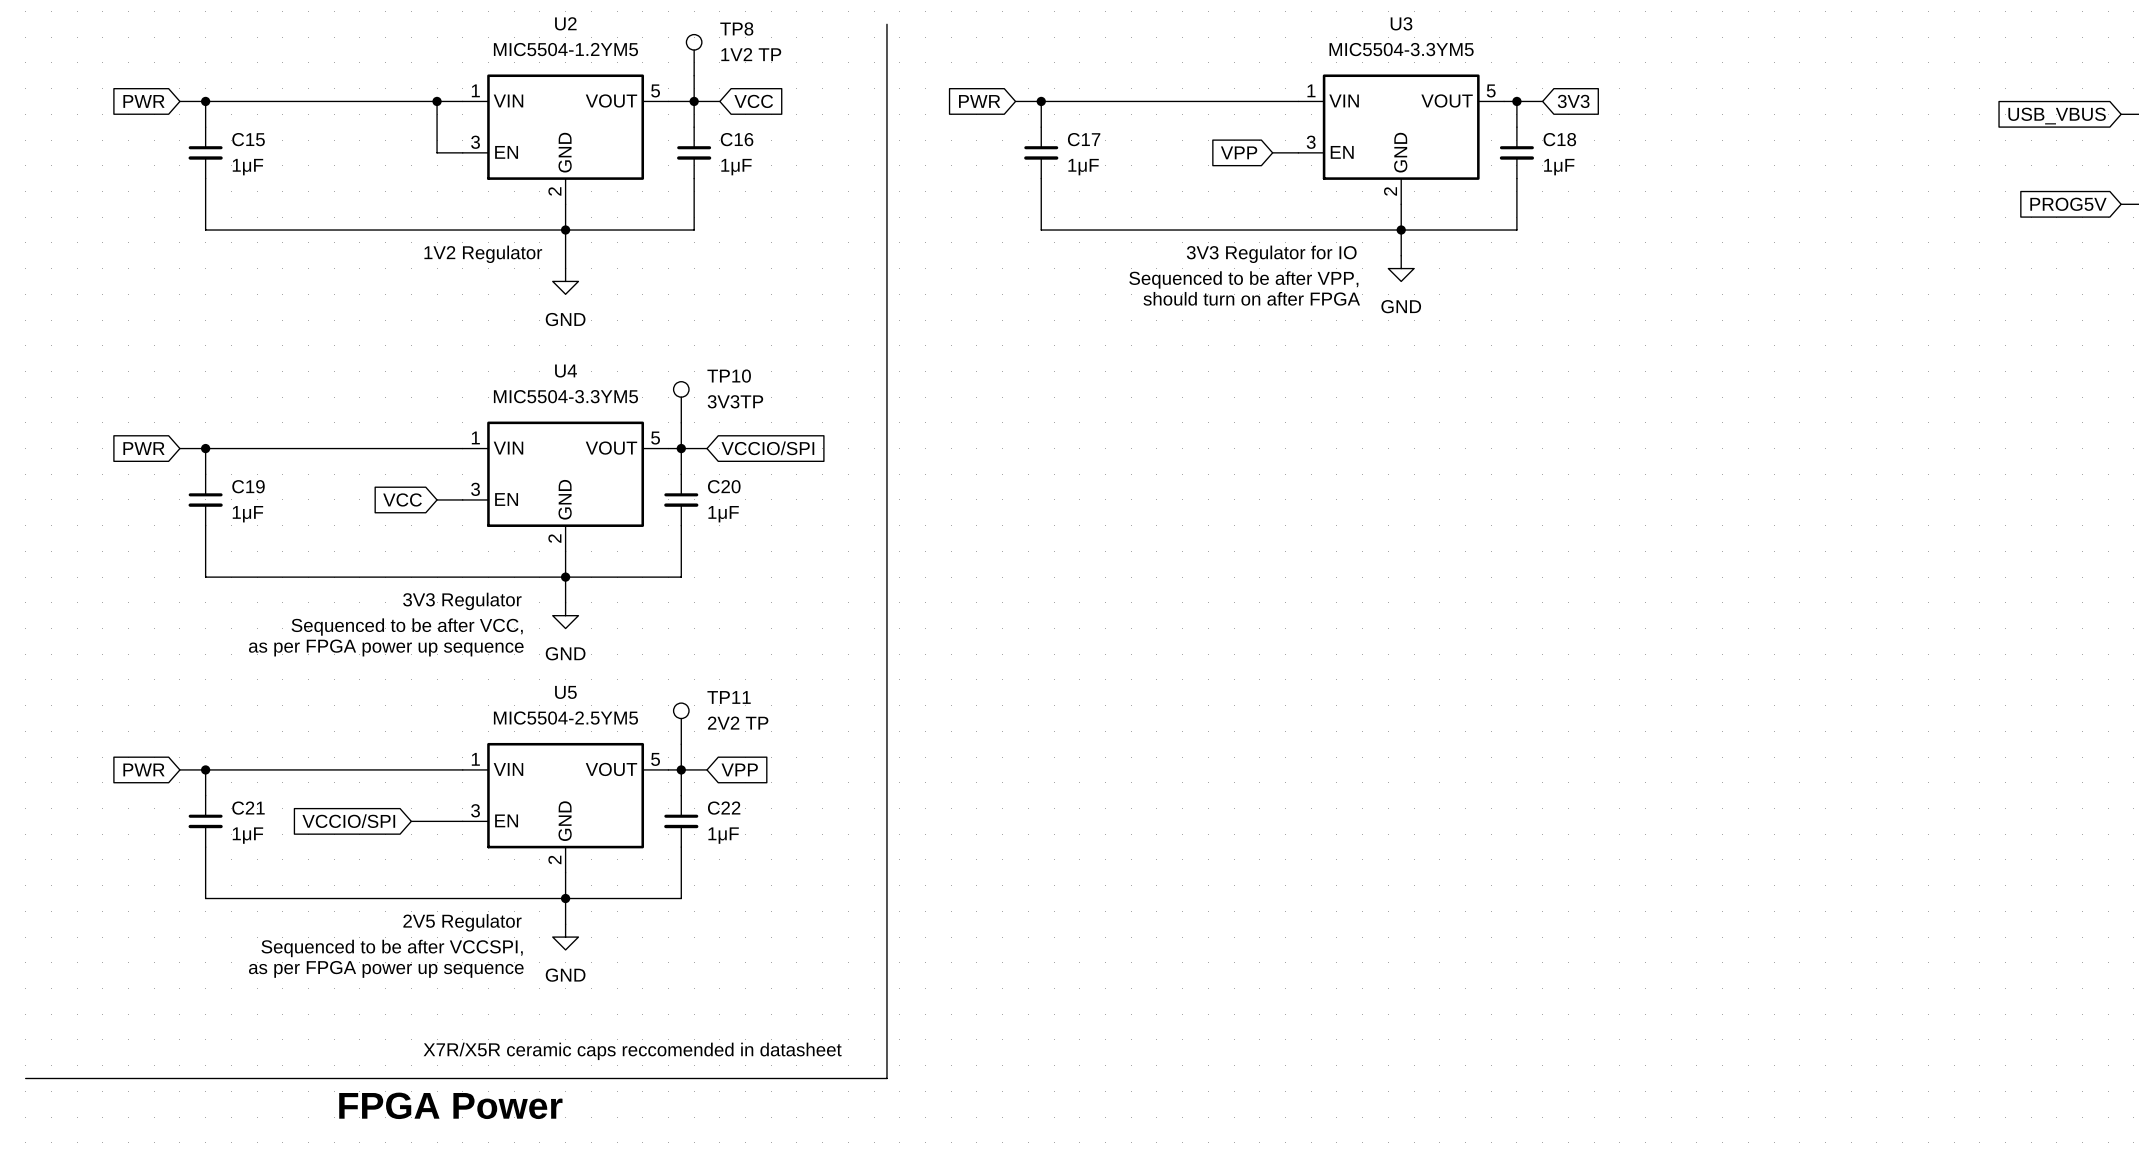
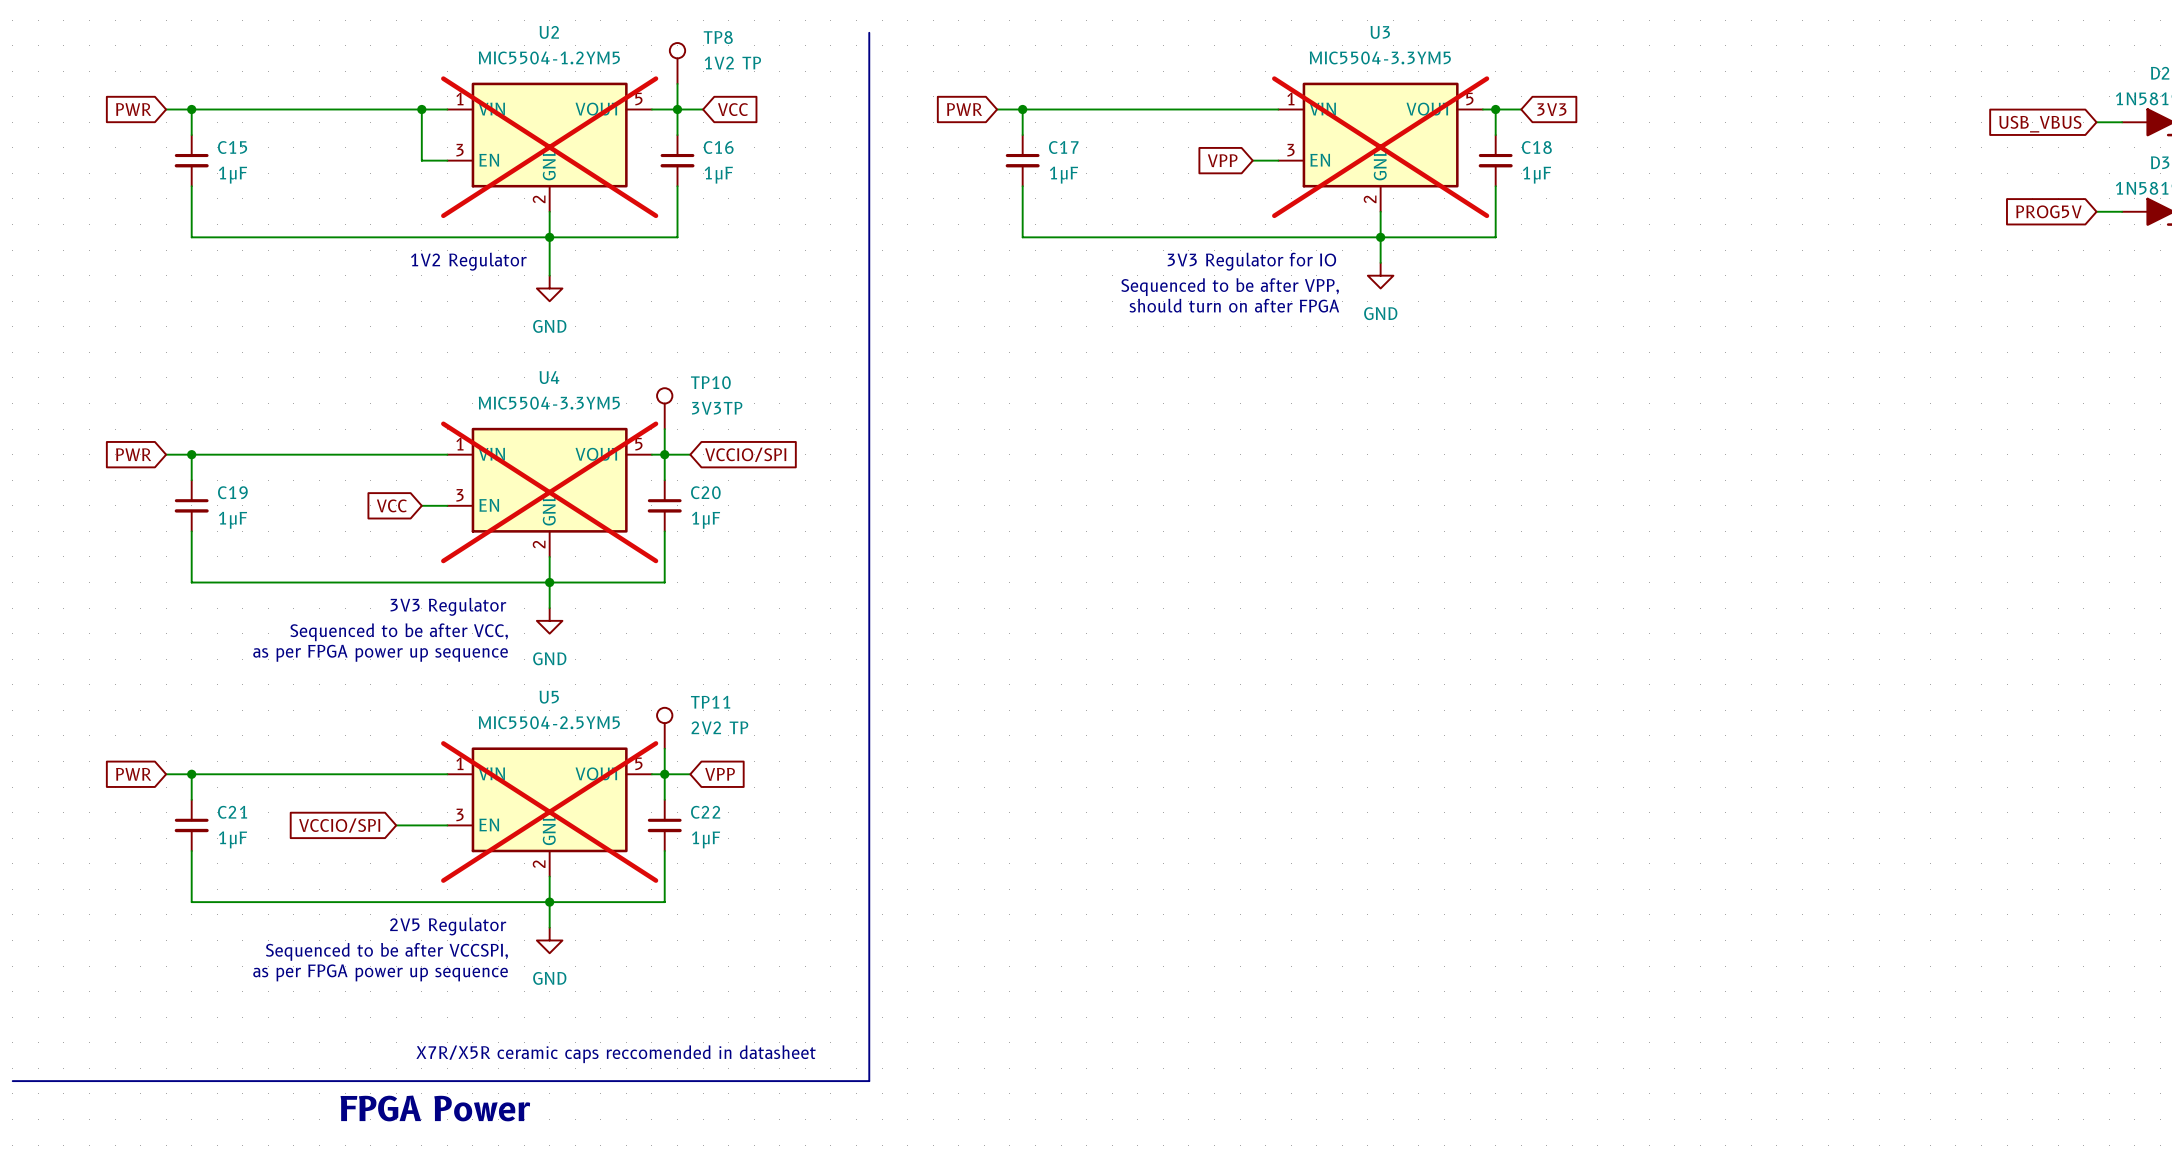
U2 do-not-place cross: none -> (549, 147)
U3 do-not-place cross: none -> (1380, 147)
U4 do-not-place cross: none -> (549, 492)
U5 do-not-place cross: none -> (549, 811)

